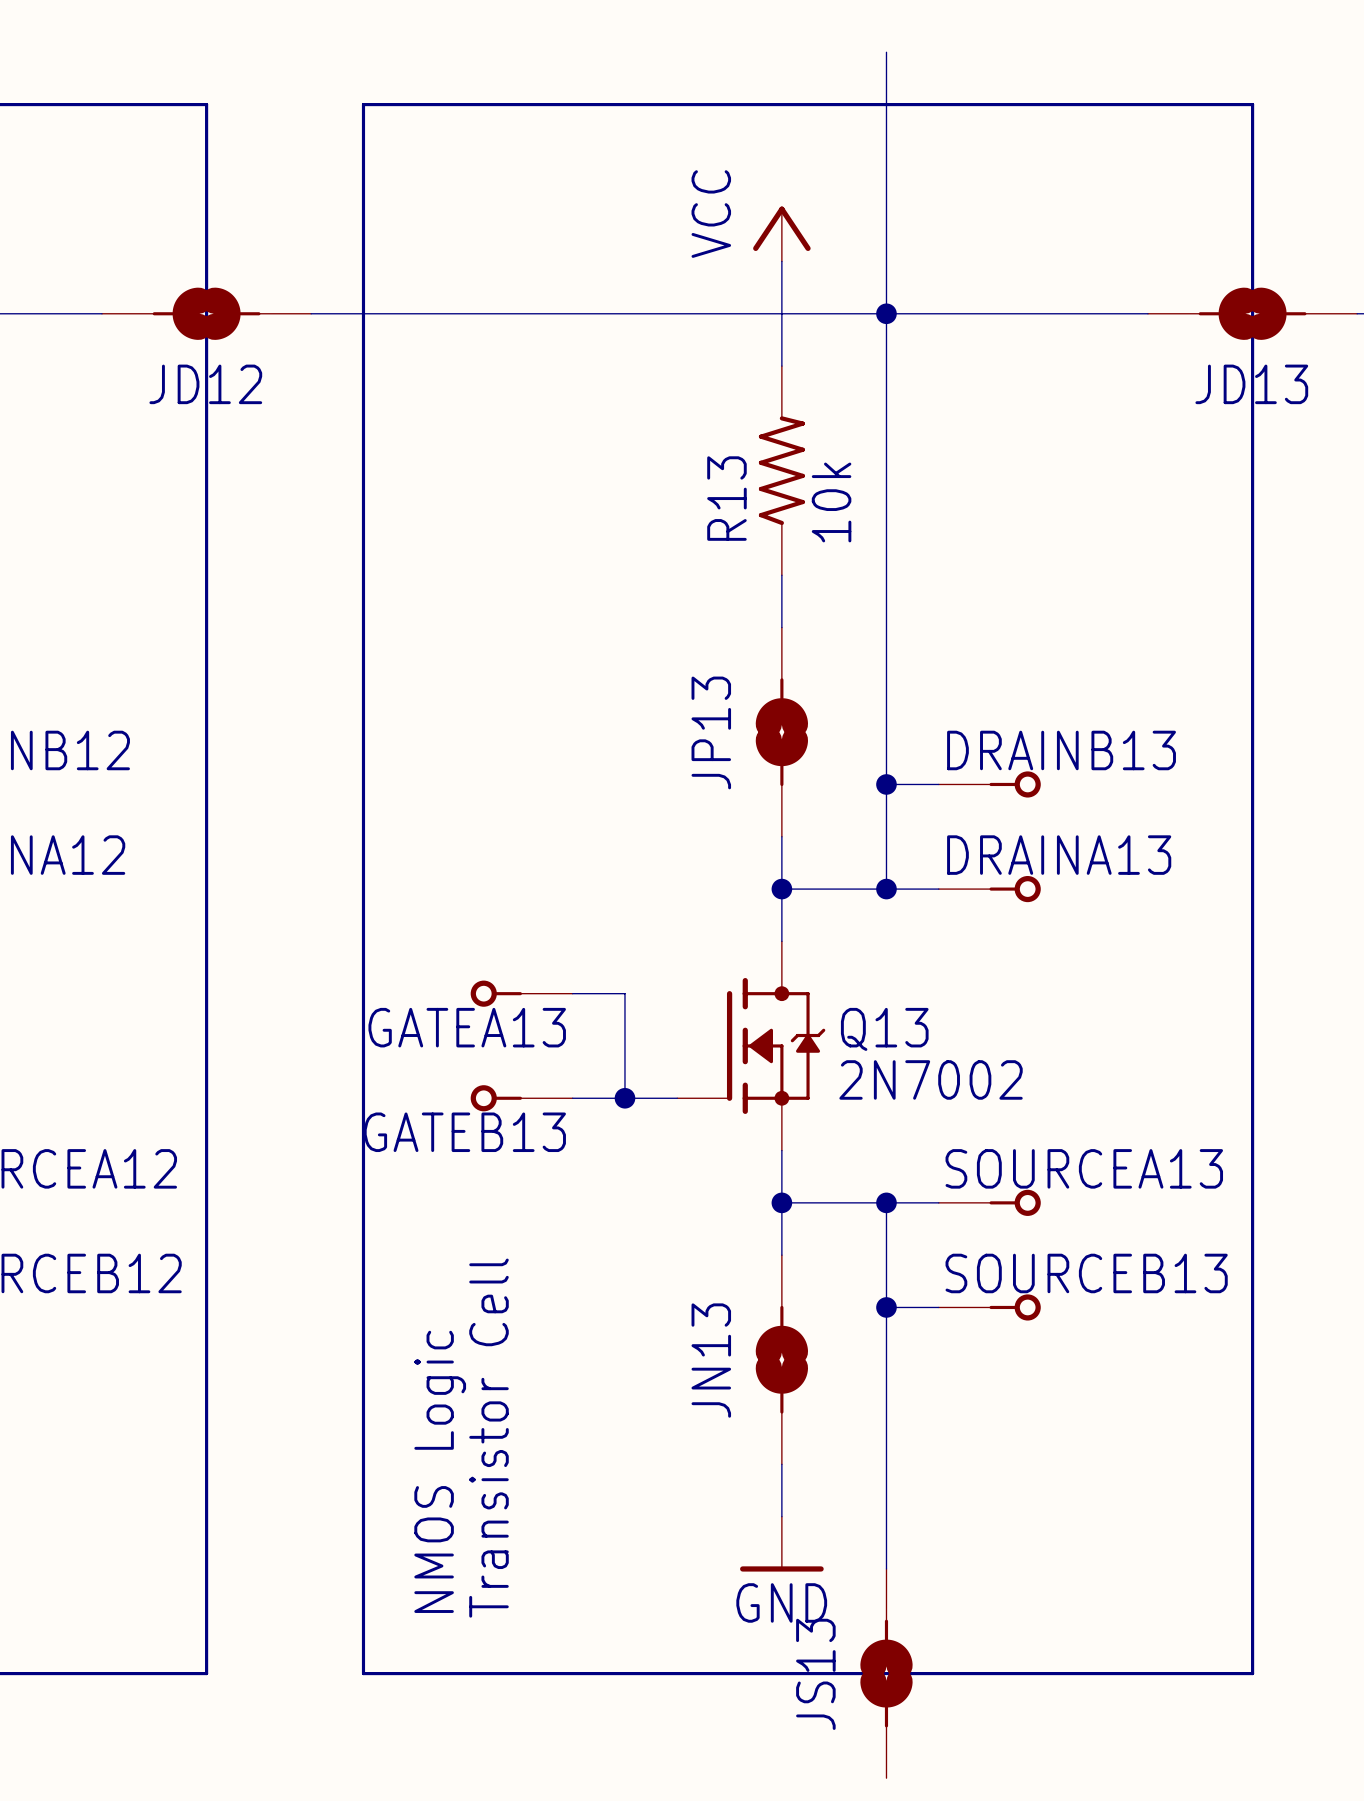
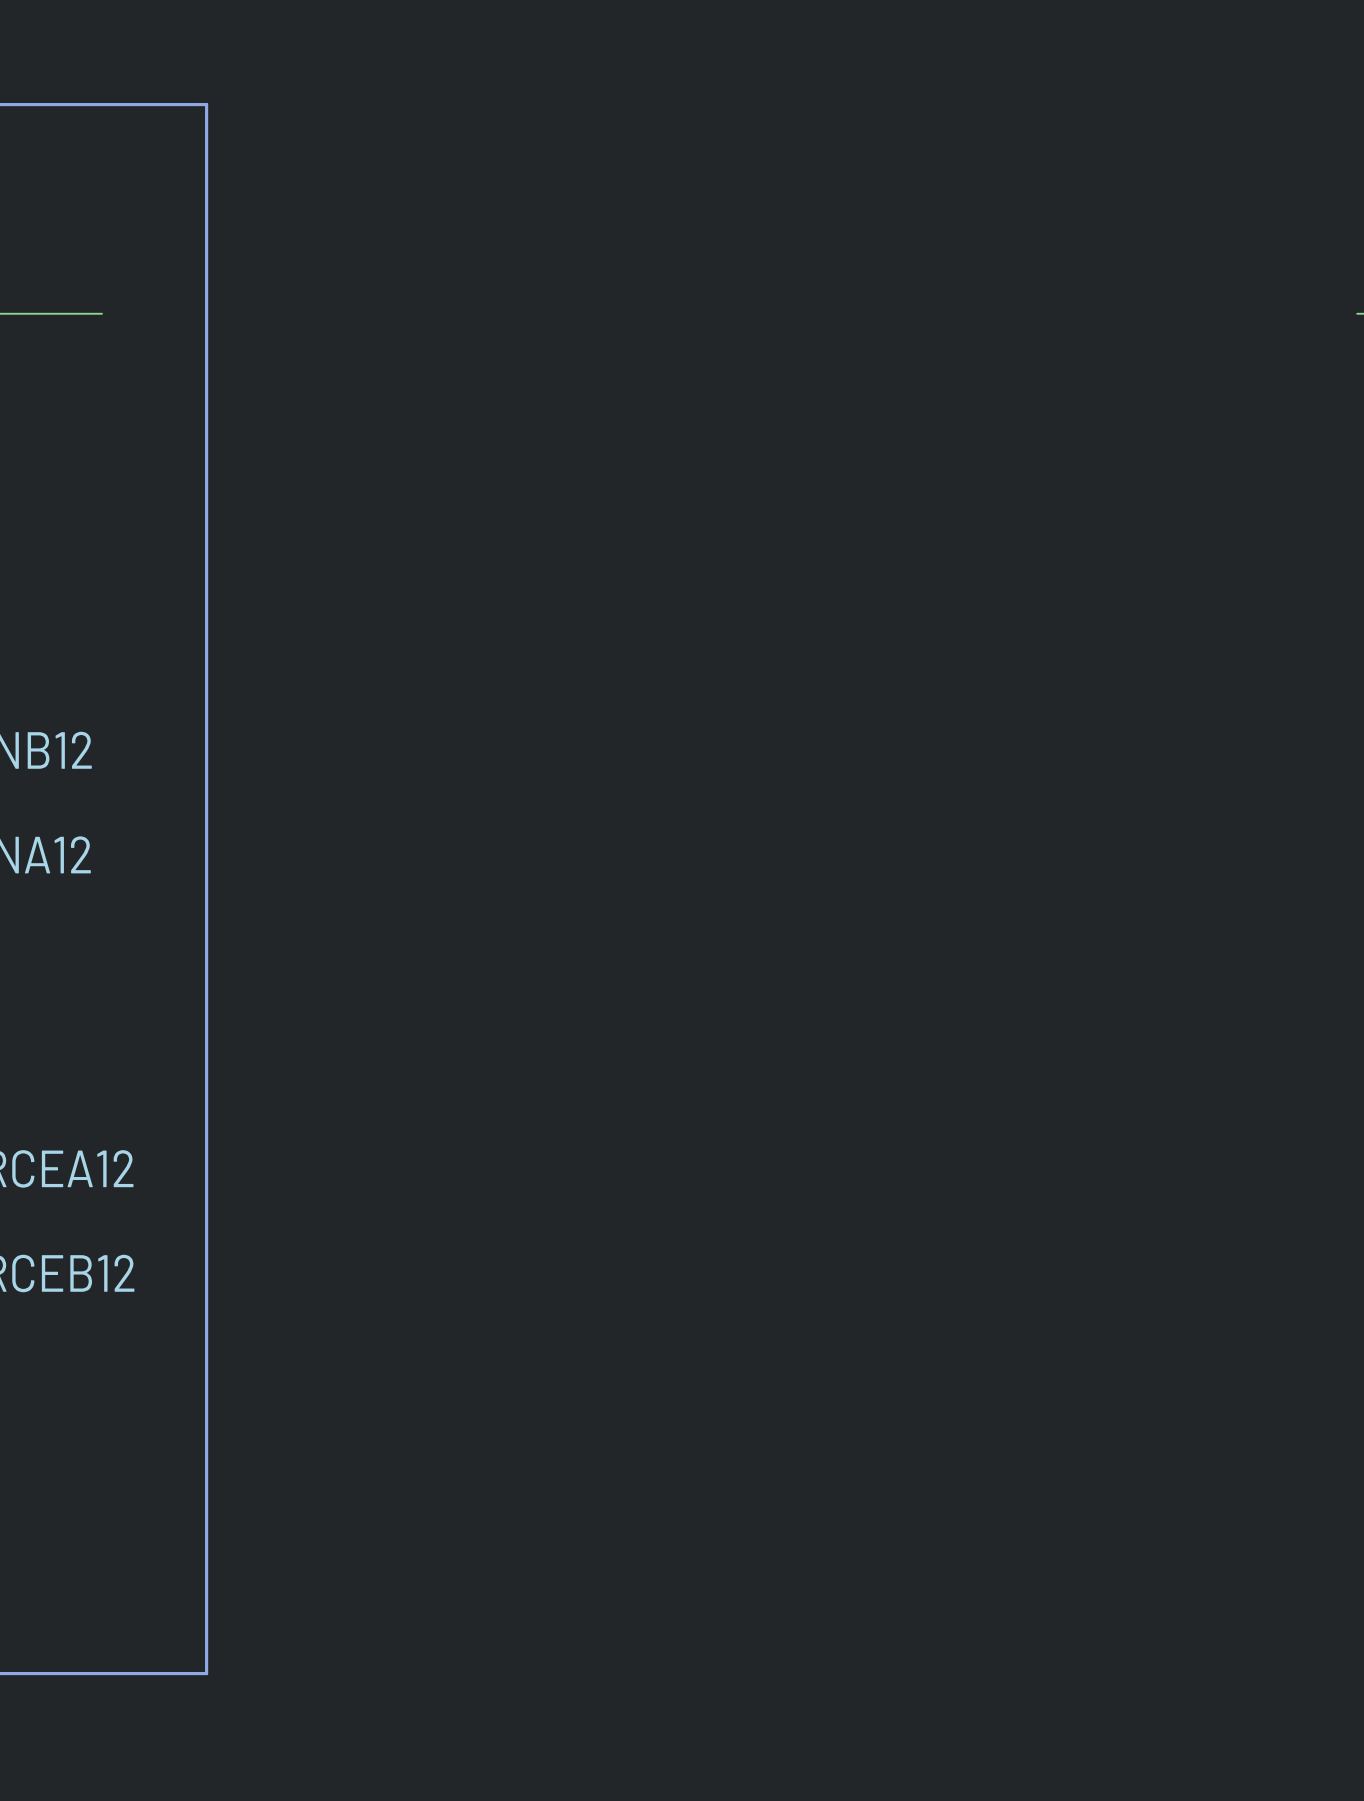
wire: (886, 52) (886, 889) -> none
line: (363, 104) (1252, 104) (1252, 1673) (363, 1673) (363, 104) -> none
power symbol: VCC (781, 234) -> none
wire: (781, 261) (781, 366) -> none
JD12: (206, 313) -> none
wire: (311, 313) (1147, 313) -> none
junction: (886, 313) -> none
JD13: (1252, 313) -> none
R13: 10k (781, 470) -> none
wire: (781, 575) (781, 627) -> none
JP13: (781, 732) -> none
wire: (886, 784) (938, 784) -> none
junction: (886, 784) -> none
DRAINB13: (989, 784) -> none
wire: (781, 836) (781, 941) -> none
wire: (781, 889) (938, 889) -> none
junction: (781, 889) -> none
junction: (886, 889) -> none
DRAINA13: (989, 889) -> none
GATEA13: (521, 993) -> none
wire: (572, 993) (624, 993) (624, 1098) -> none
Q13: 2N7002 (751, 1045) -> none
GATEB13: (521, 1098) -> none
wire: (572, 1098) (677, 1098) -> none
junction: (624, 1098) -> none
wire: (781, 1150) (781, 1255) -> none
wire: (781, 1202) (938, 1202) -> none
junction: (781, 1202) -> none
wire: (886, 1202) (886, 1568) -> none
junction: (886, 1202) -> none
SOURCEA13: (989, 1202) -> none
wire: (886, 1307) (938, 1307) -> none
junction: (886, 1307) -> none
SOURCEB13: (989, 1307) -> none
JN13: (781, 1359) -> none
text: Transistor Cell (489, 1438) -> none
wire: (781, 1464) (781, 1516) -> none
text: NMOS Logic (440, 1471) -> none
power symbol: GND (781, 1544) -> none
JS13: (886, 1673) -> none

